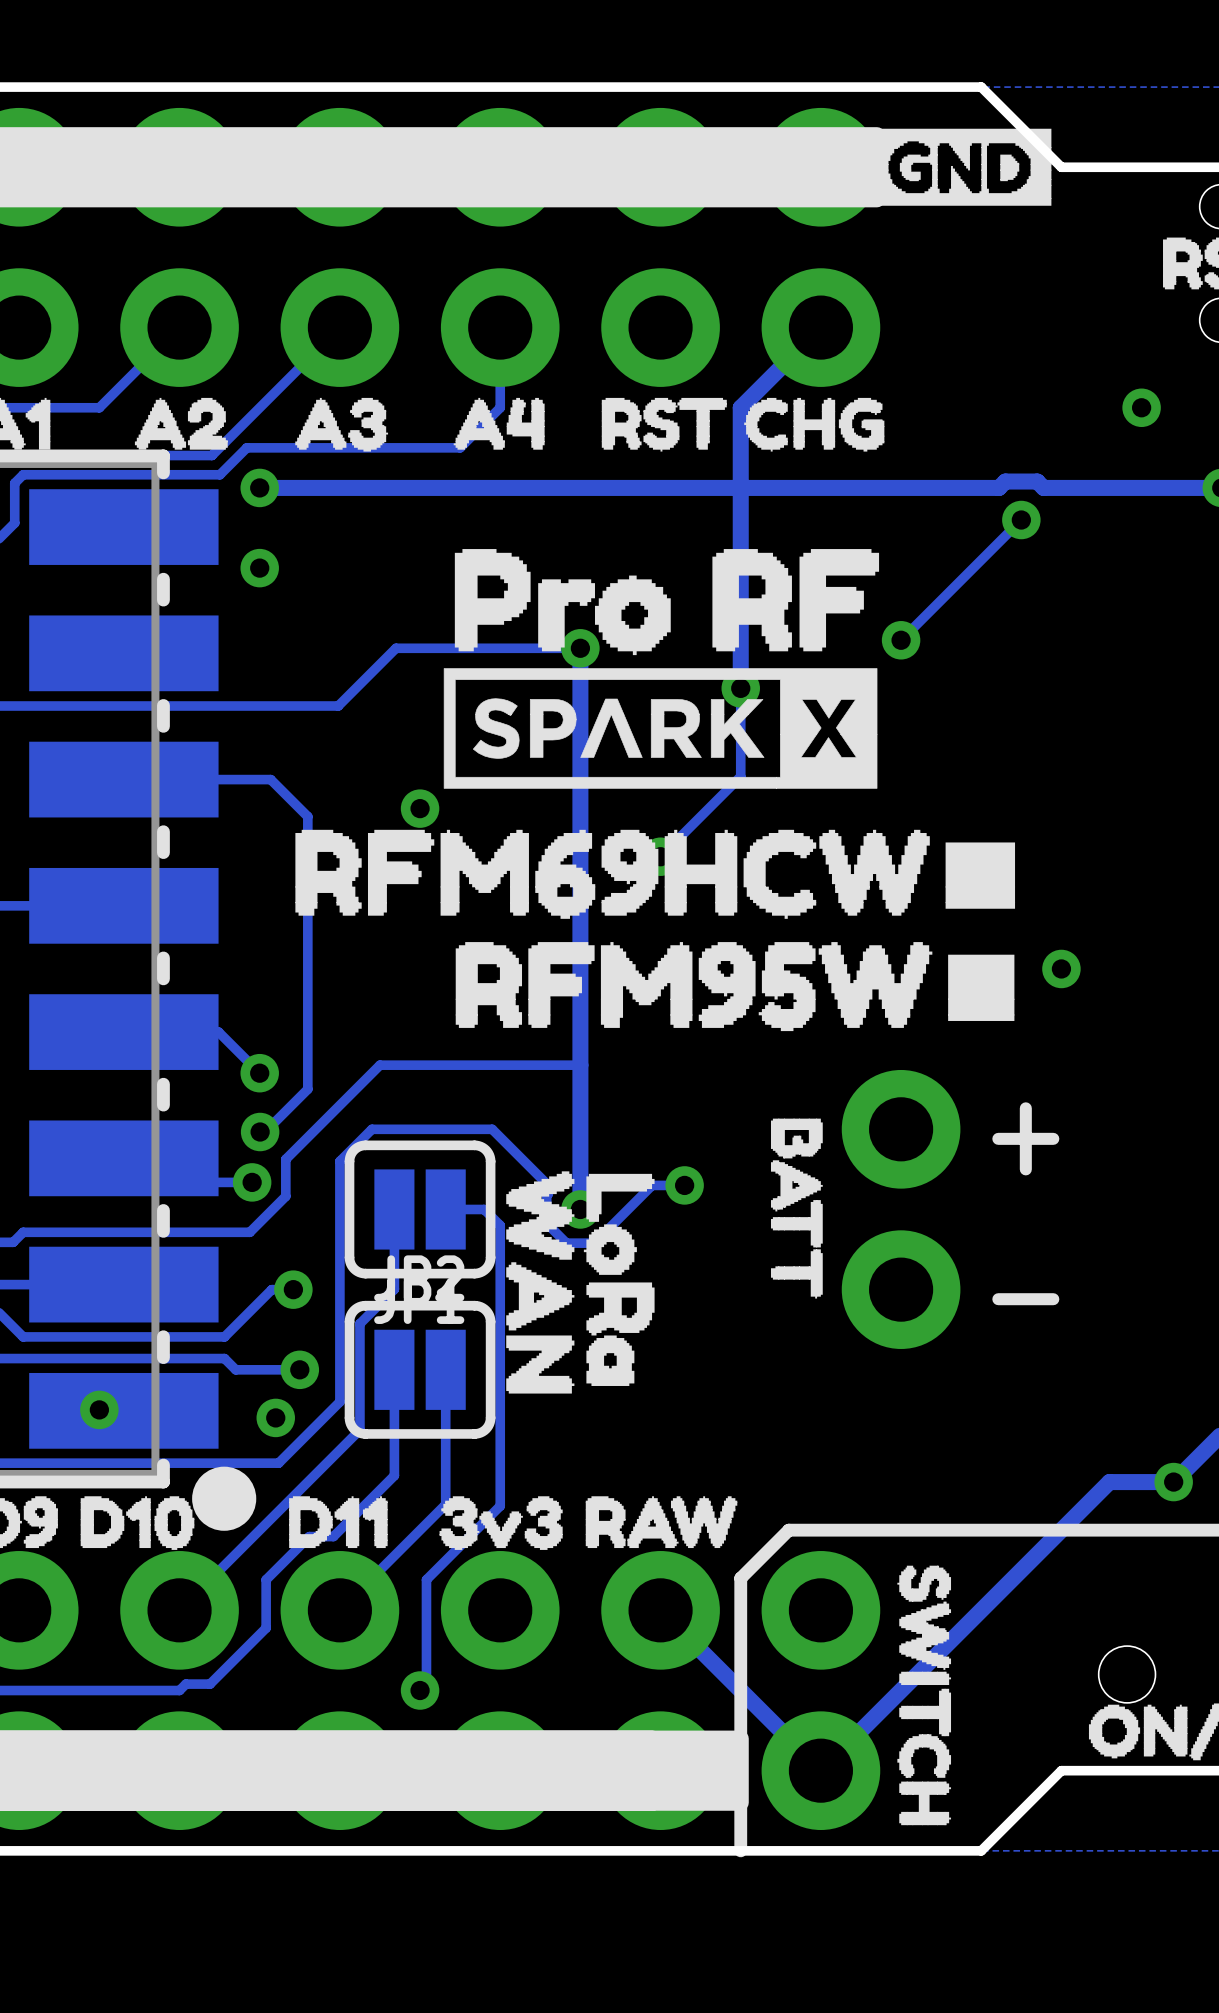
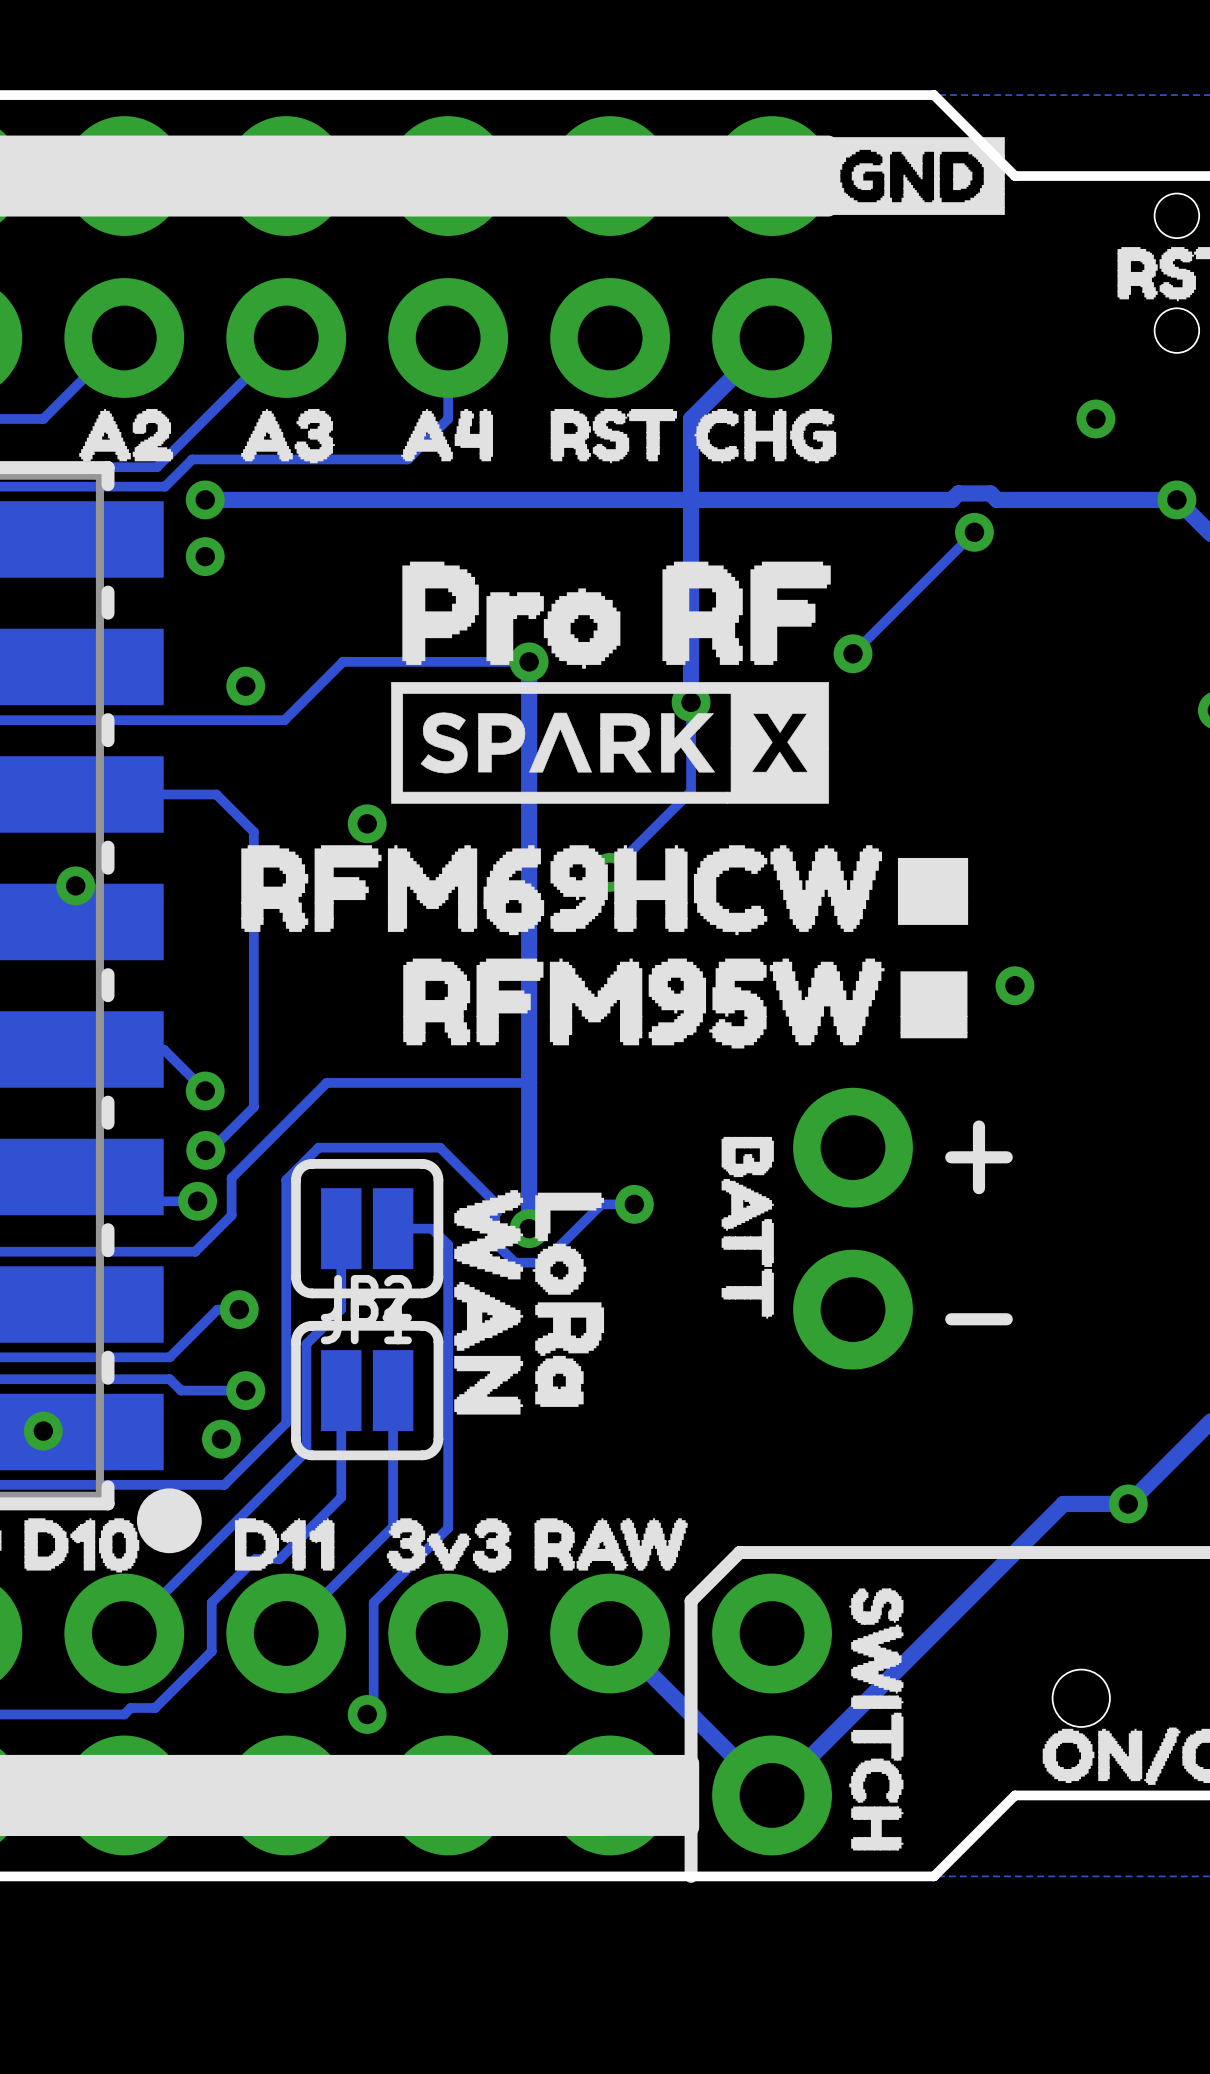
via position: (259, 568) -> (205, 556)
via: none -> (245, 686)
via: none -> (75, 885)

